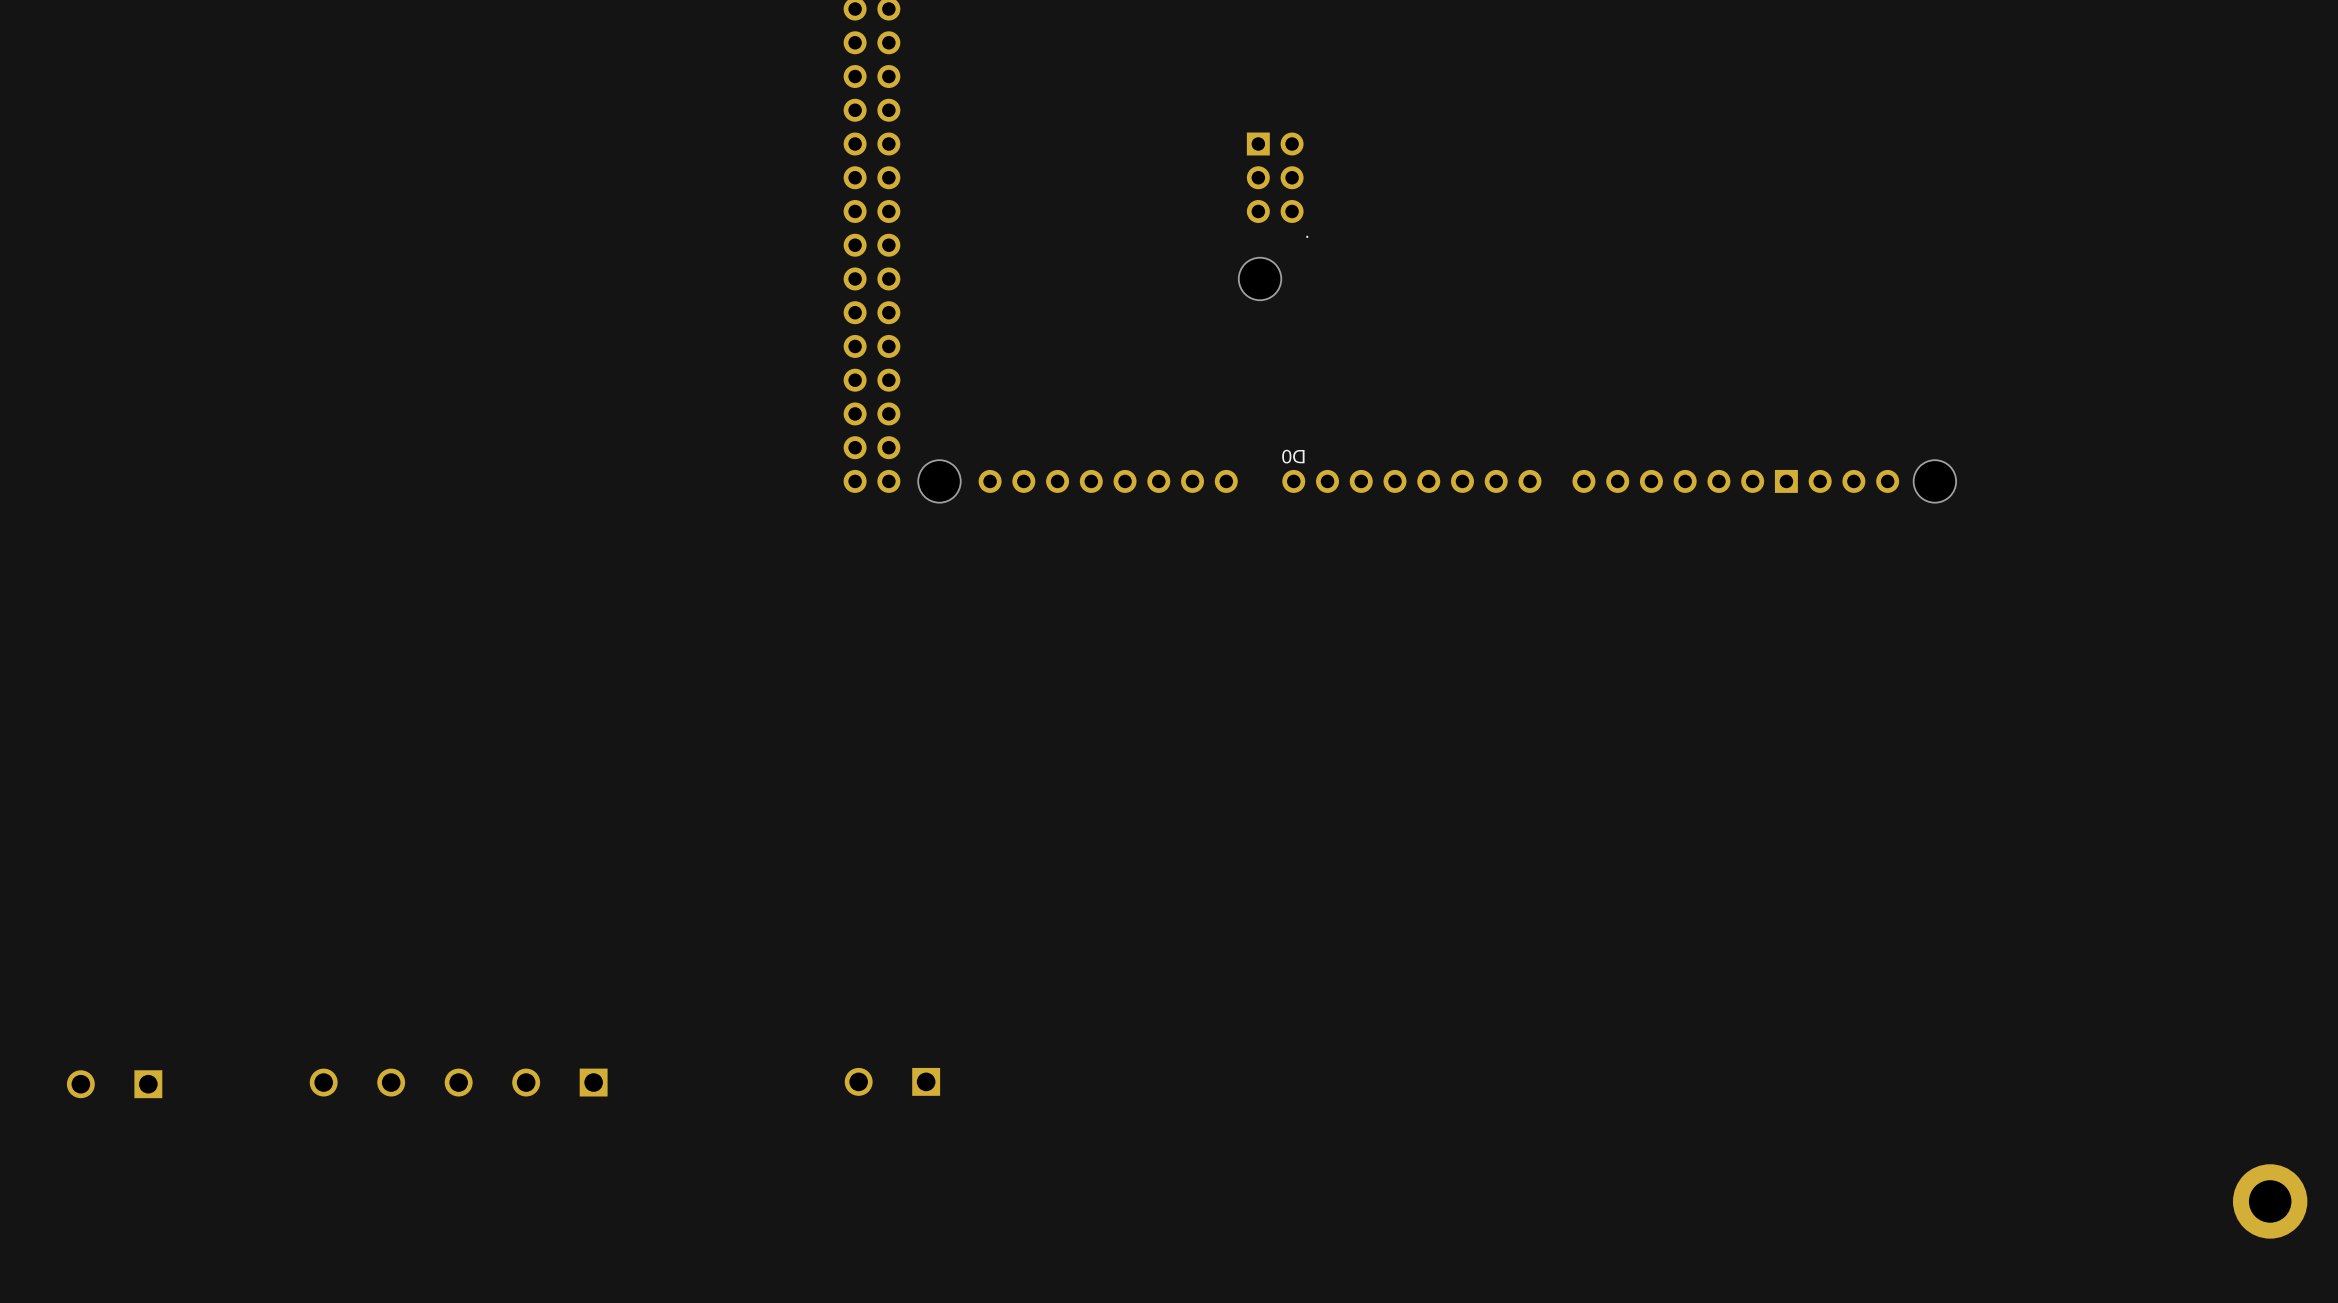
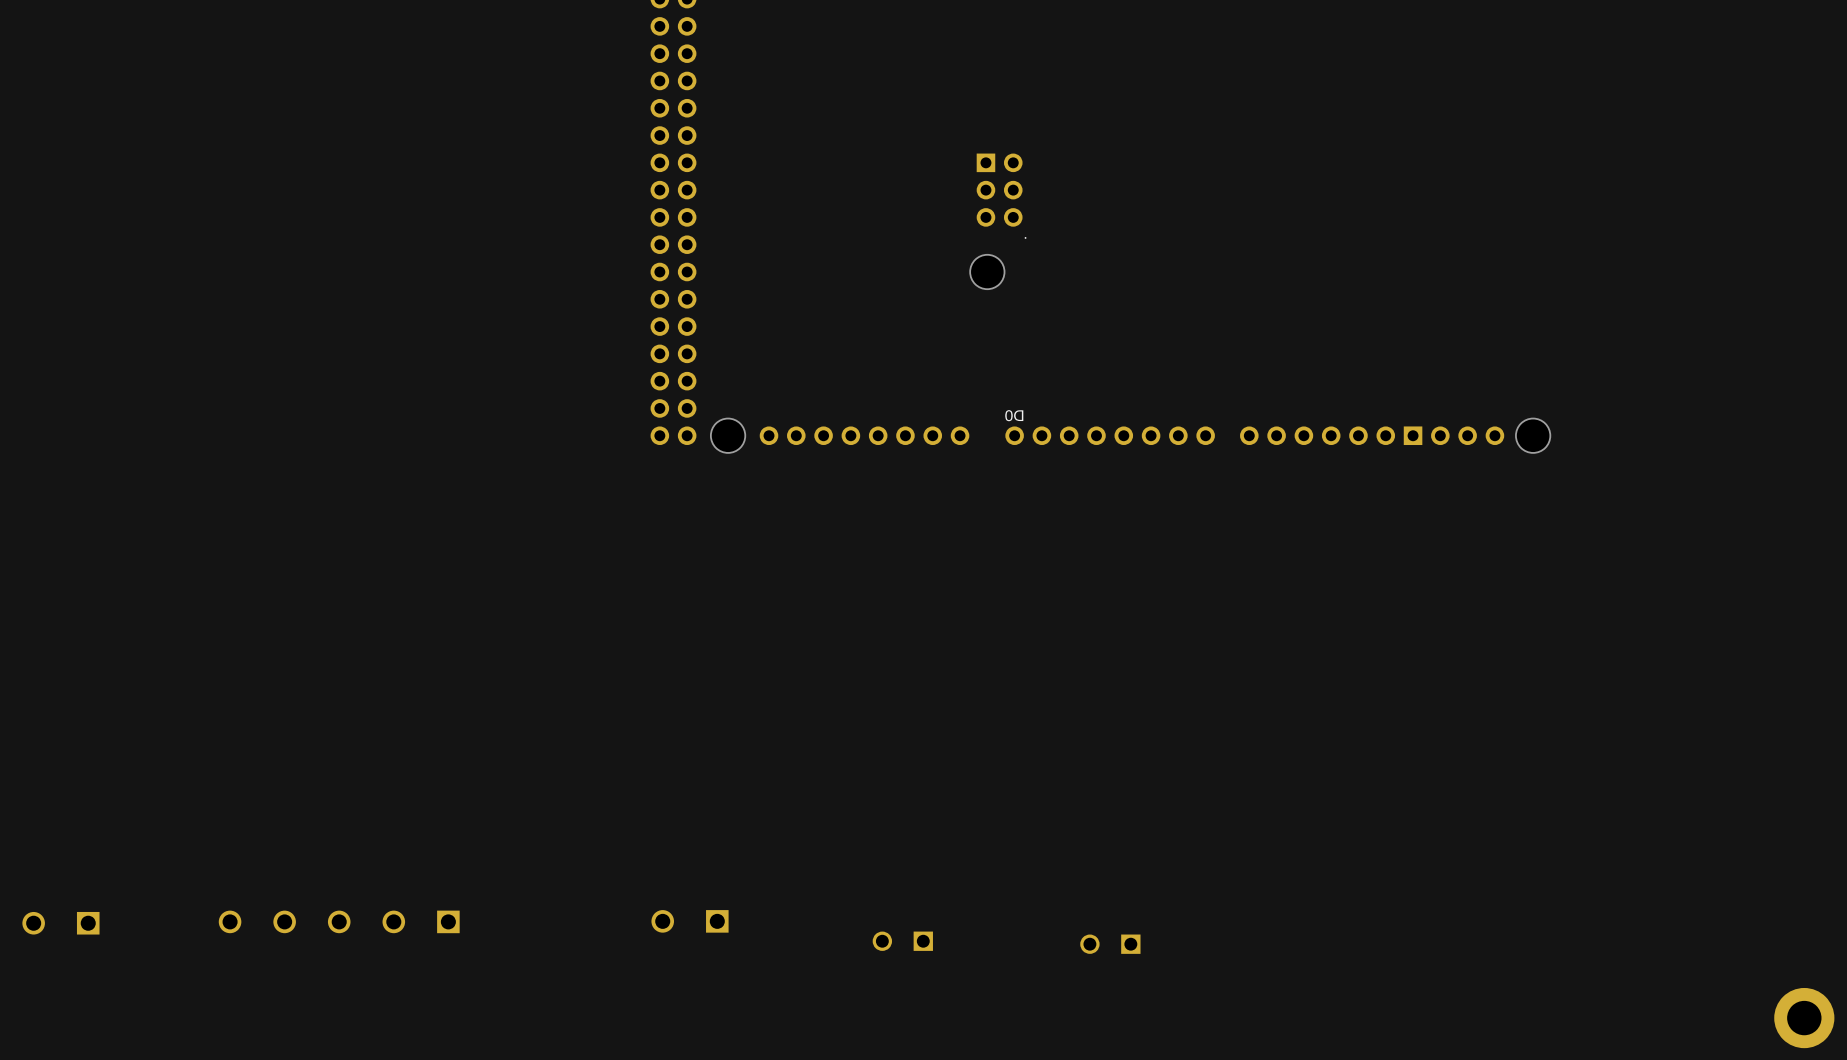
part: none -> (902, 941)
part: none -> (1110, 944)

